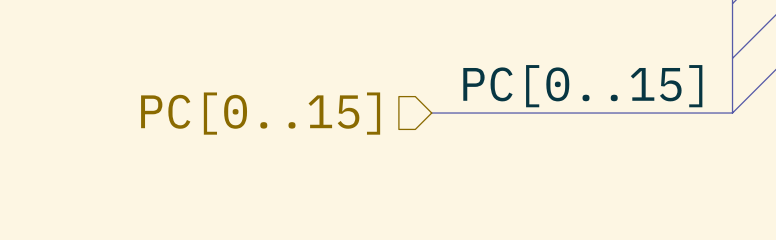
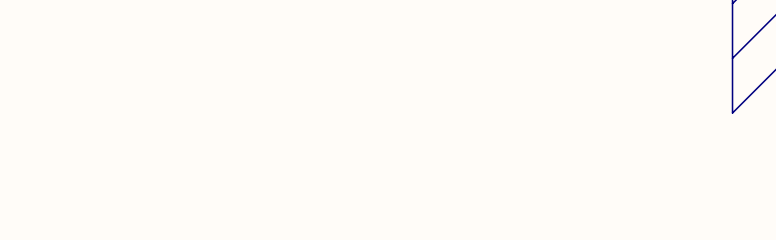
label: PC[0..15] (582, 86) -> none
hierarchical label: PC[0..15] (260, 113) -> none
bus: (431, 113) (732, 113) -> none

